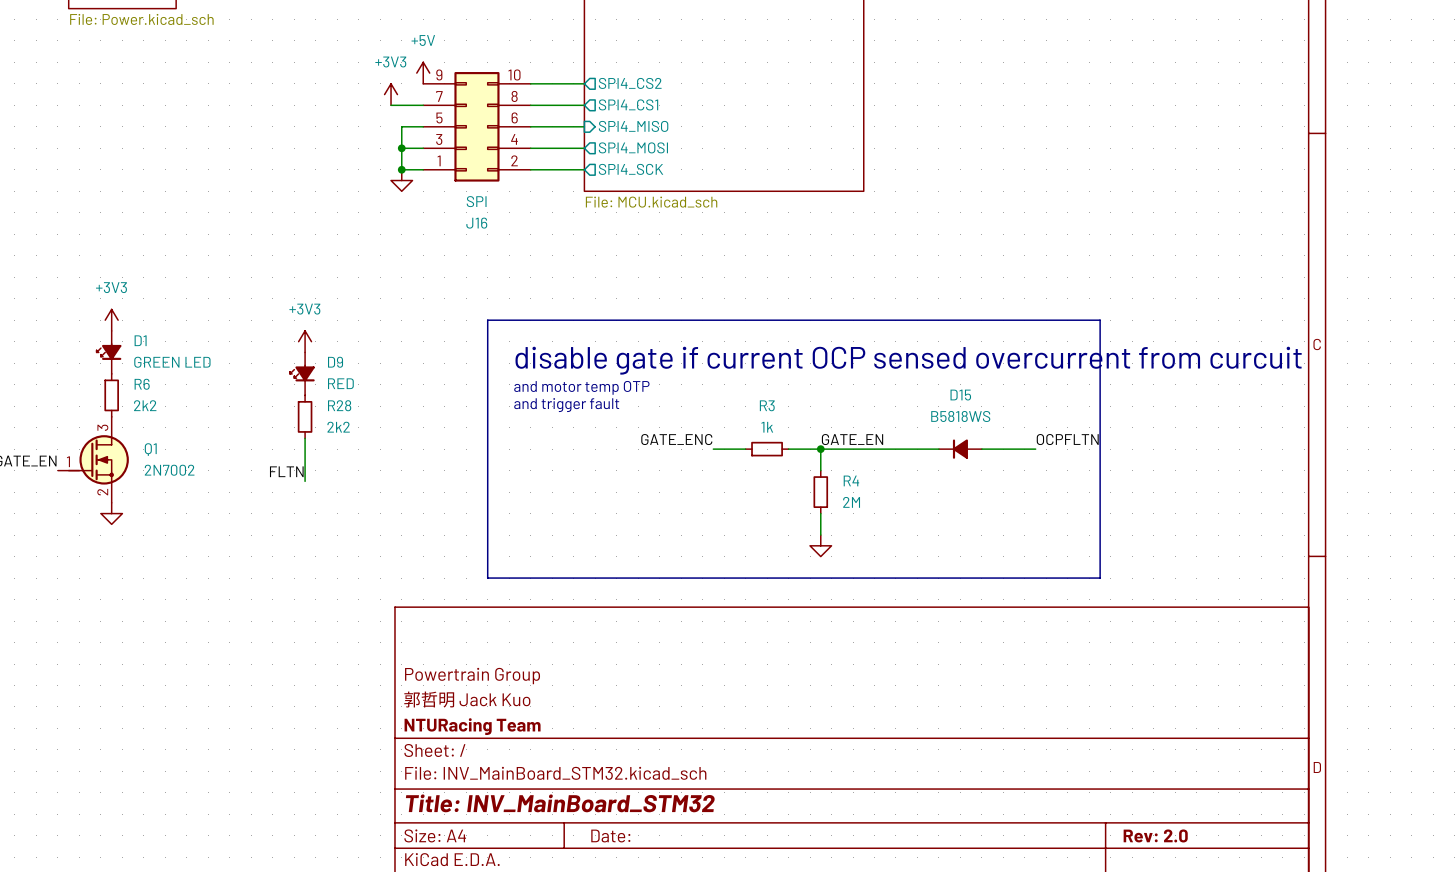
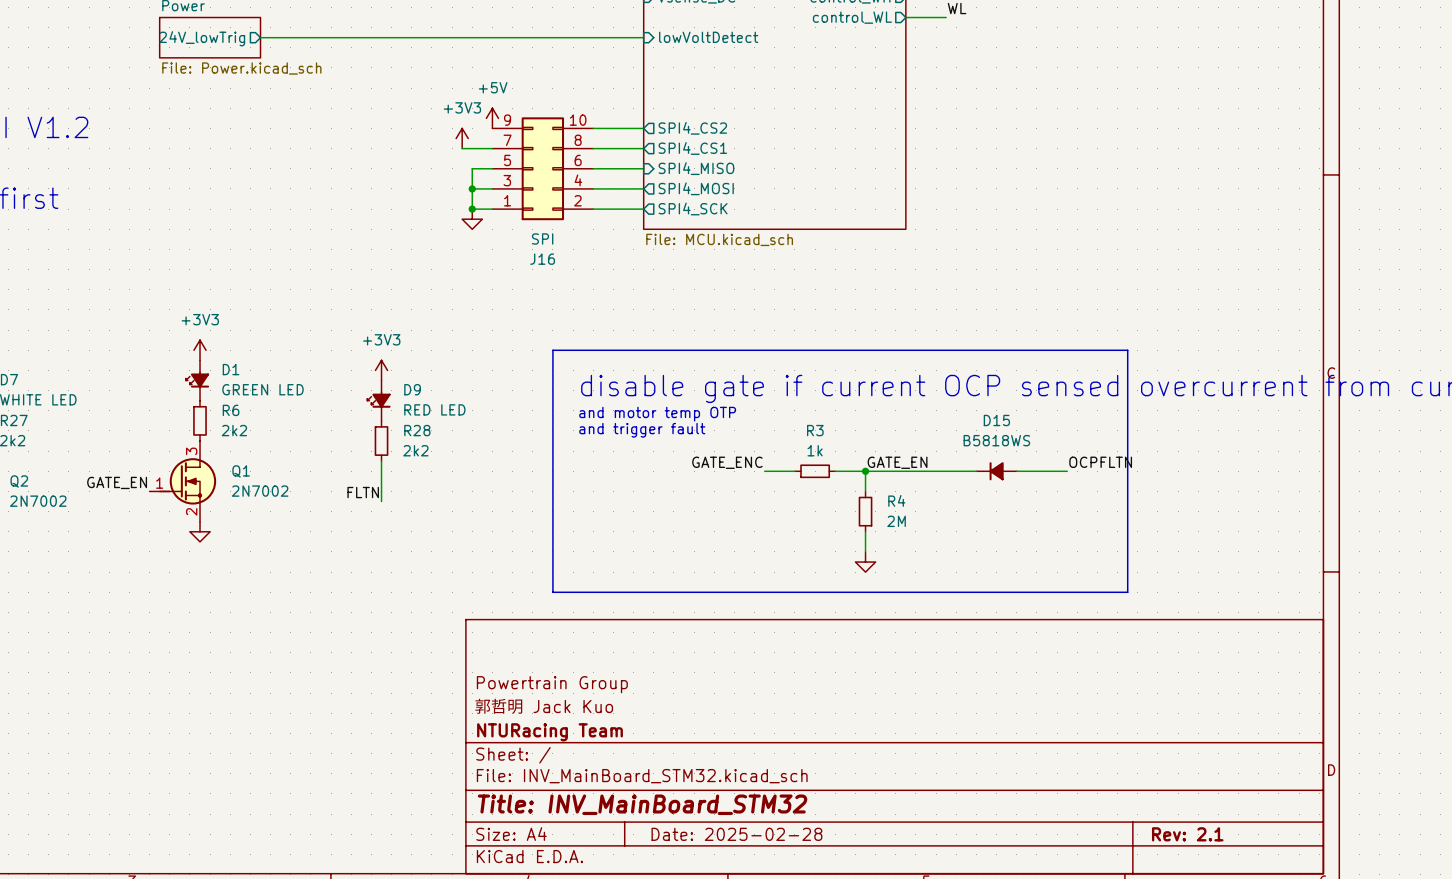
D9 value: RED (340, 383) -> RED LED (434, 409)
title block: Rev: 2.0 (1155, 835) -> Rev: 2.1 (1187, 834)
title block: Date: (610, 836) -> Date: 2025-02-28 (736, 834)

